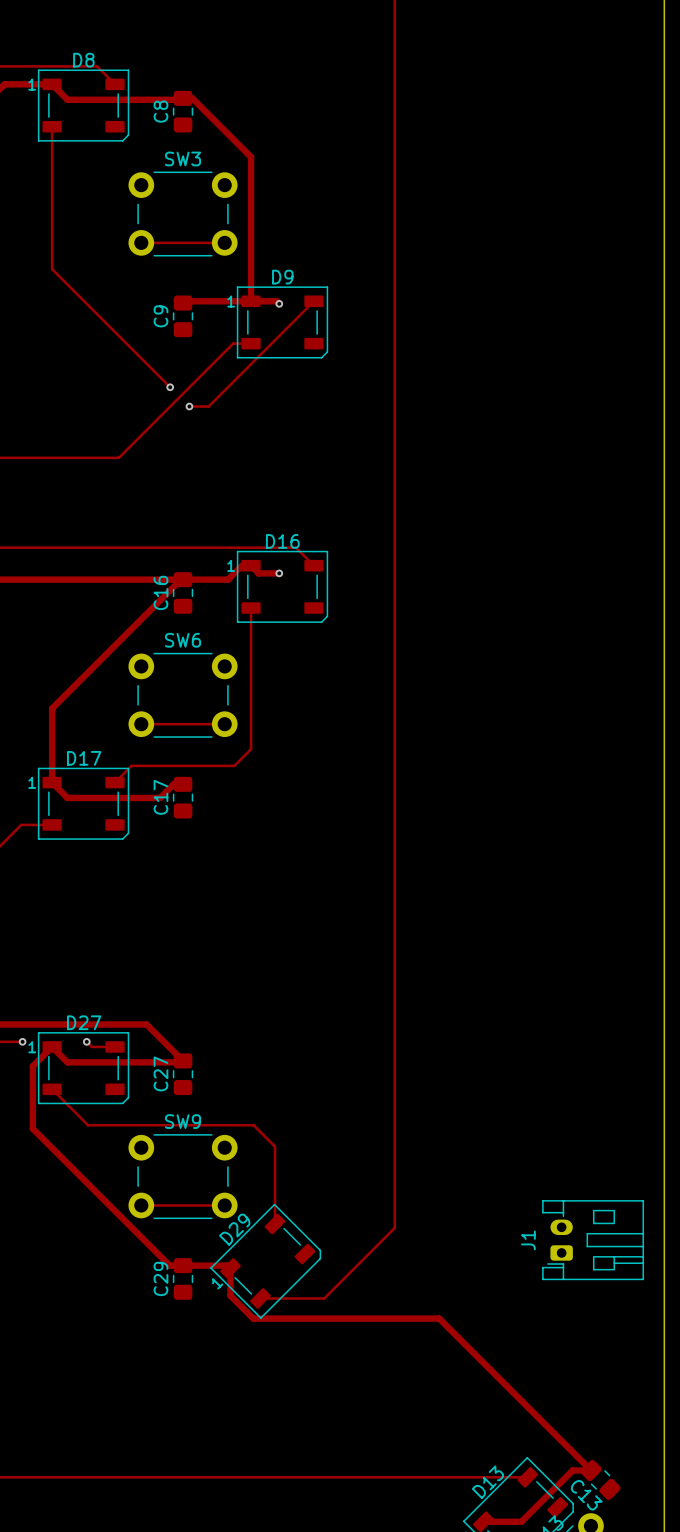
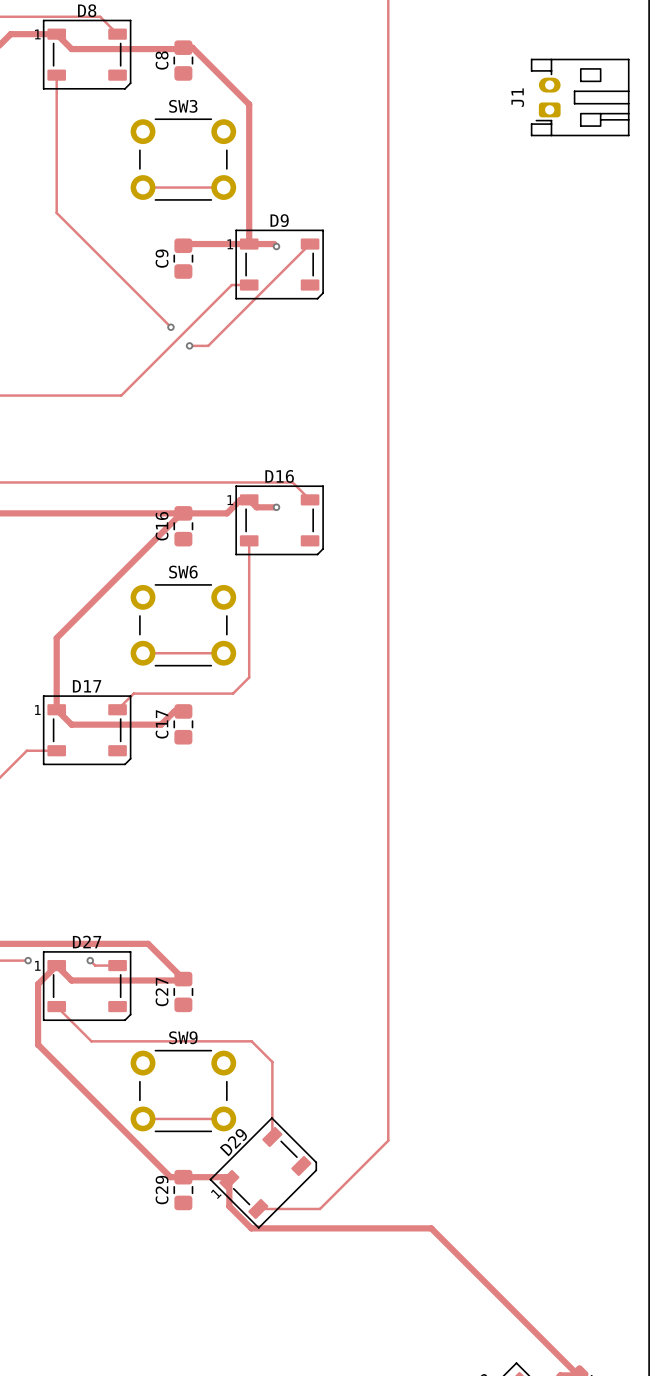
J1 position: (593, 1240) -> (580, 97)

